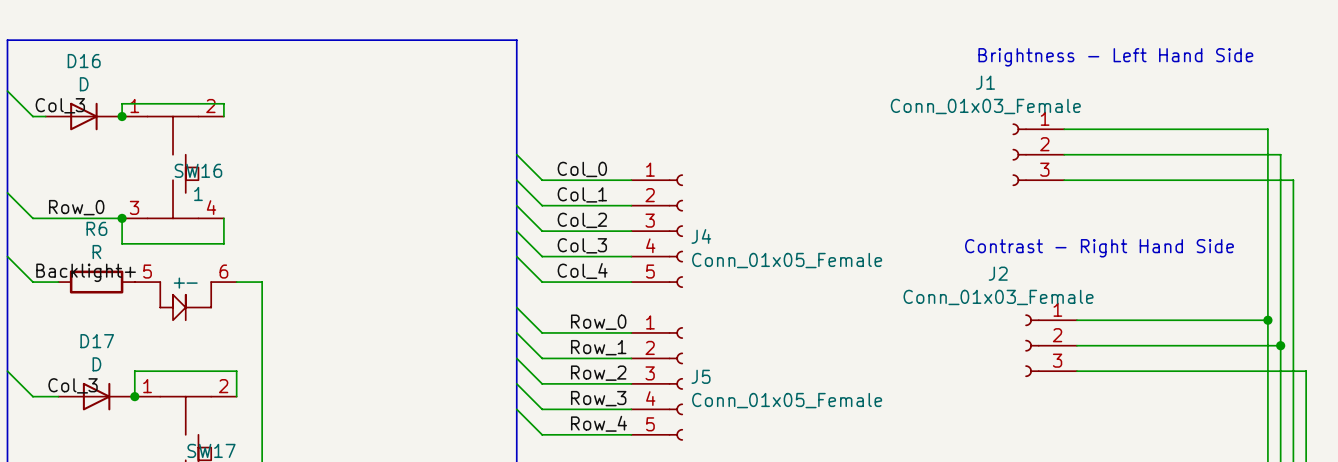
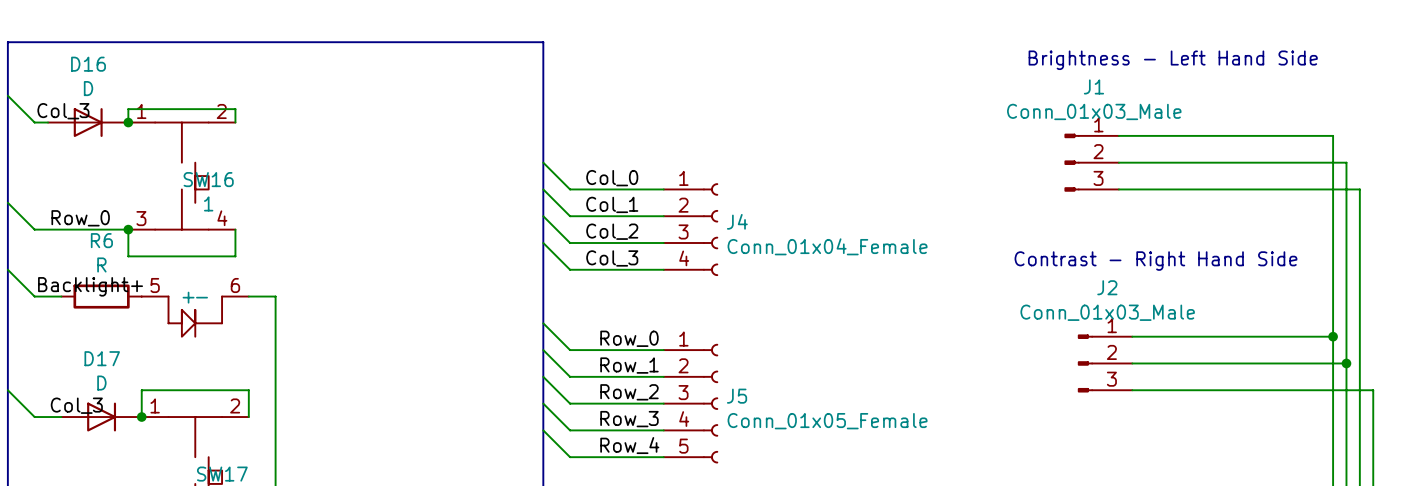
J1 name position: J1 (985, 82) -> J1 (1093, 86)
J1 value: Conn_01x03_Female (985, 106) -> Conn_01x03_Male (1094, 111)
J1 symbol: [1012, 123, 1065, 187] -> [1064, 133, 1119, 192]
J4 symbol: [631, 174, 684, 288] -> [663, 183, 719, 276]
wire: (516, 256) (542, 282) (631, 282) -> none
J4 value: Conn_01x05_Female (787, 260) -> Conn_01x04_Female (827, 246)
label: Col_4 (582, 270) -> none
J2 name position: J2 (998, 273) -> J2 (1107, 287)
J2 value: Conn_01x03_Female (998, 297) -> Conn_01x03_Male (1107, 312)
J2 symbol: [1025, 314, 1077, 378] -> [1077, 334, 1133, 393]

